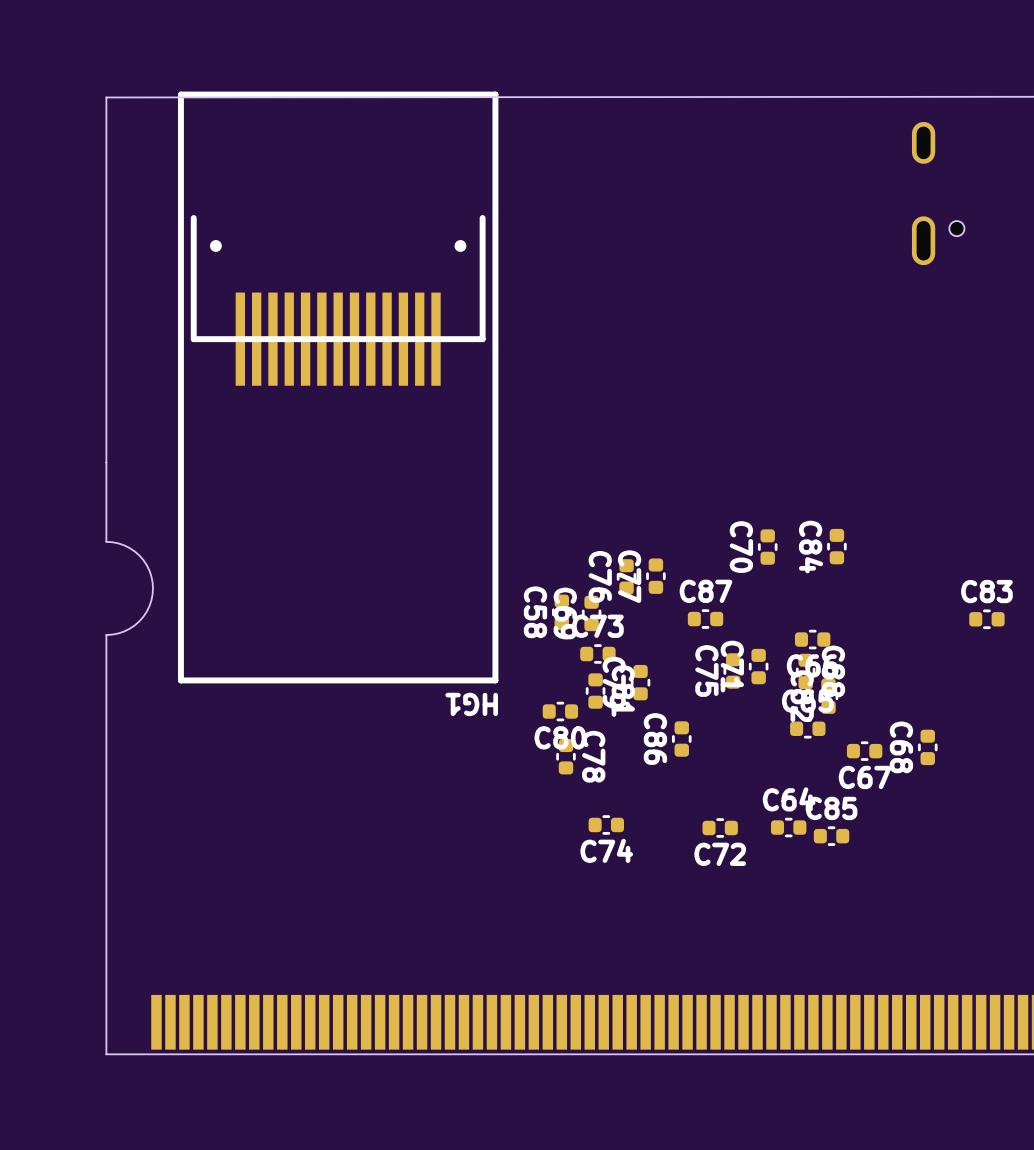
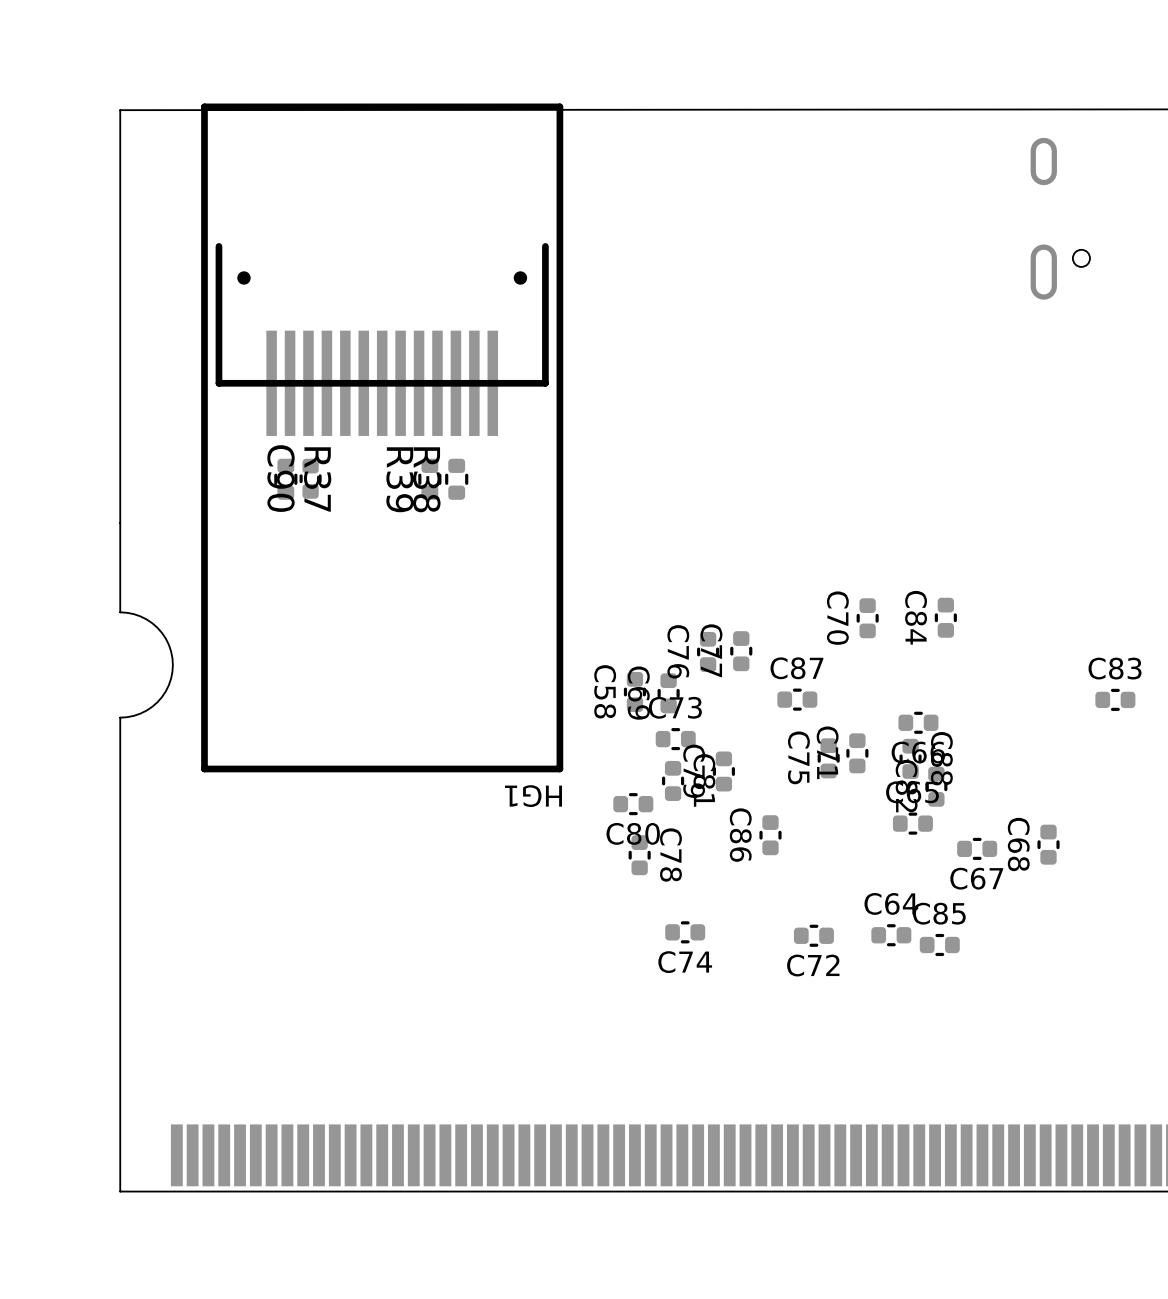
C90: none -> (310, 478)
R37: none -> (285, 479)
R39: none -> (429, 479)
R38: none -> (456, 479)

